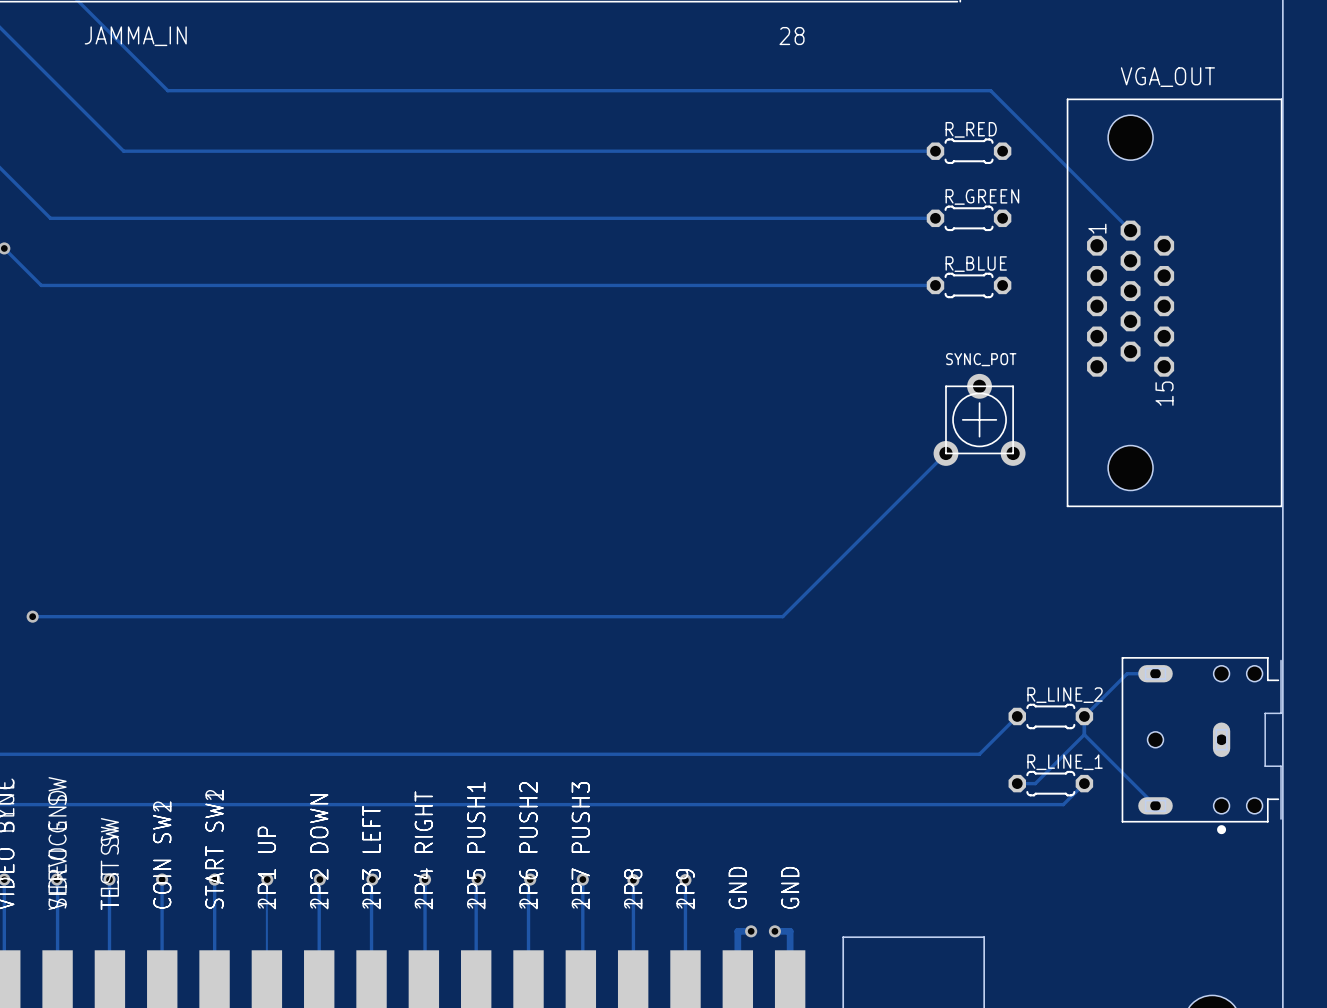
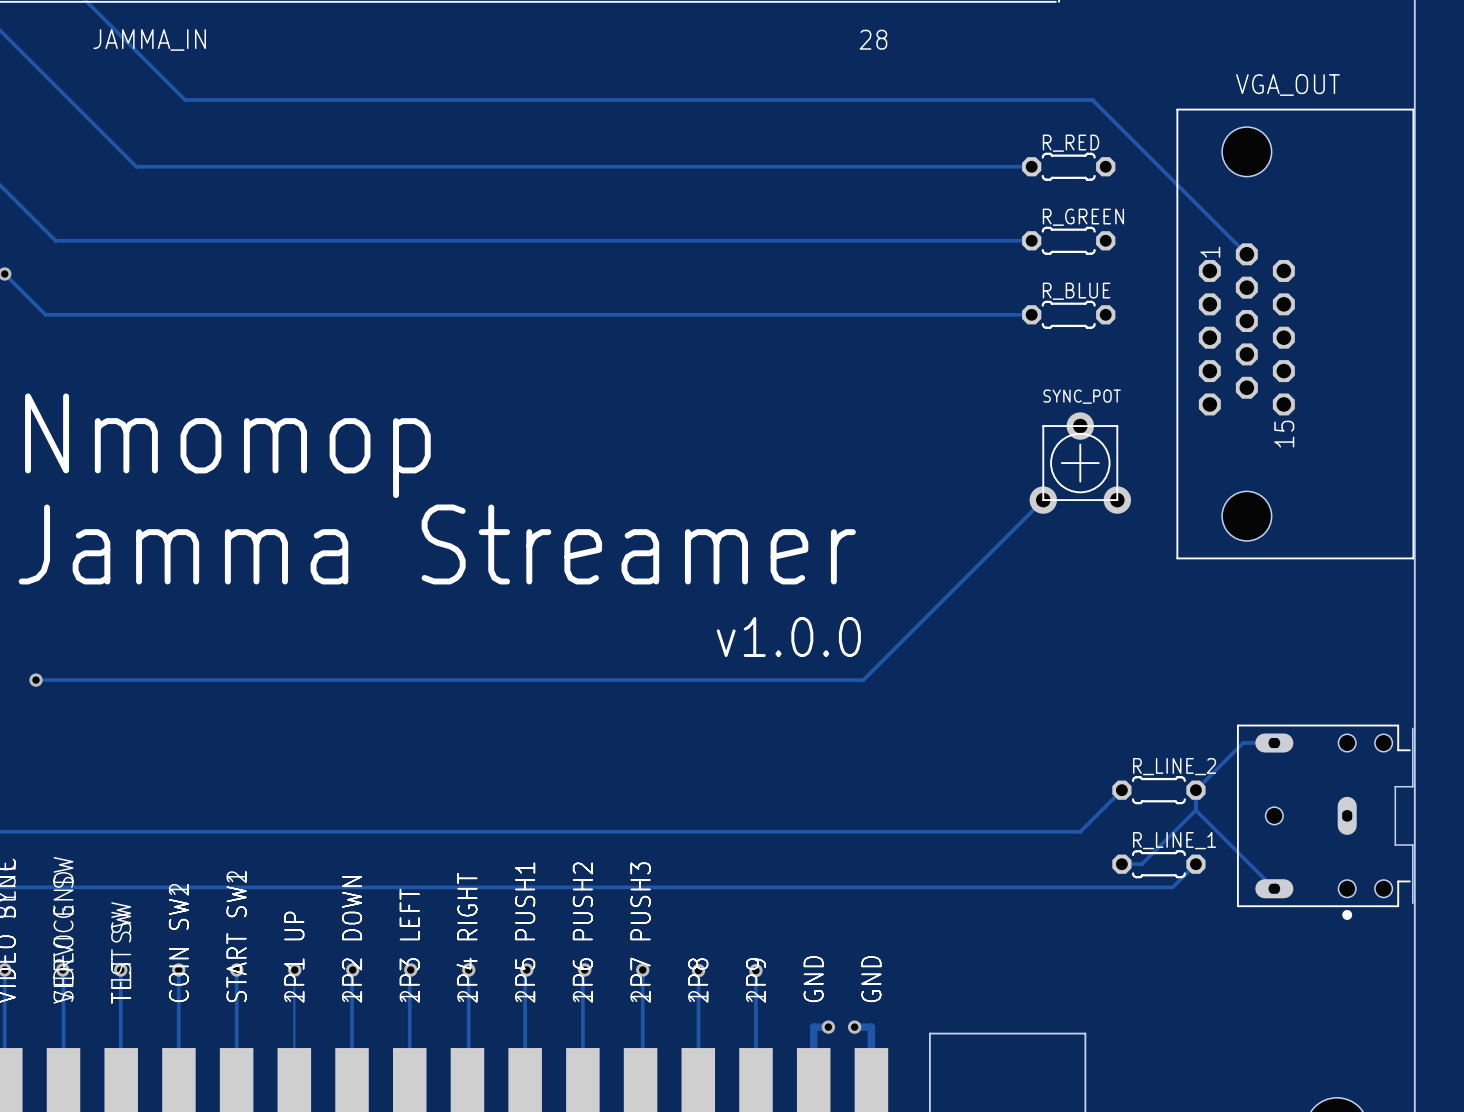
text: none -> Nmomop (227, 445)
text: none -> Jamma Streamer (437, 544)
text: none -> v1.0.0 (788, 637)

